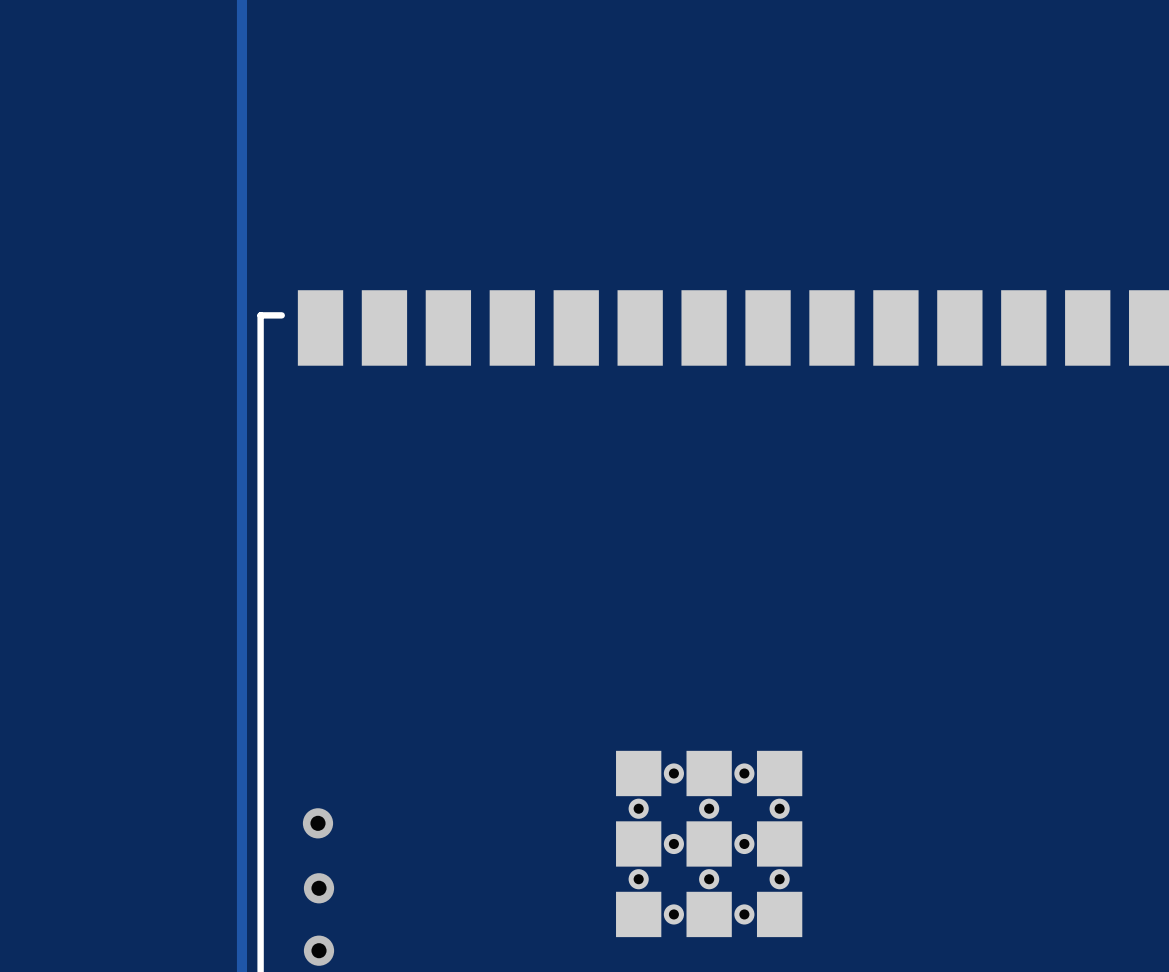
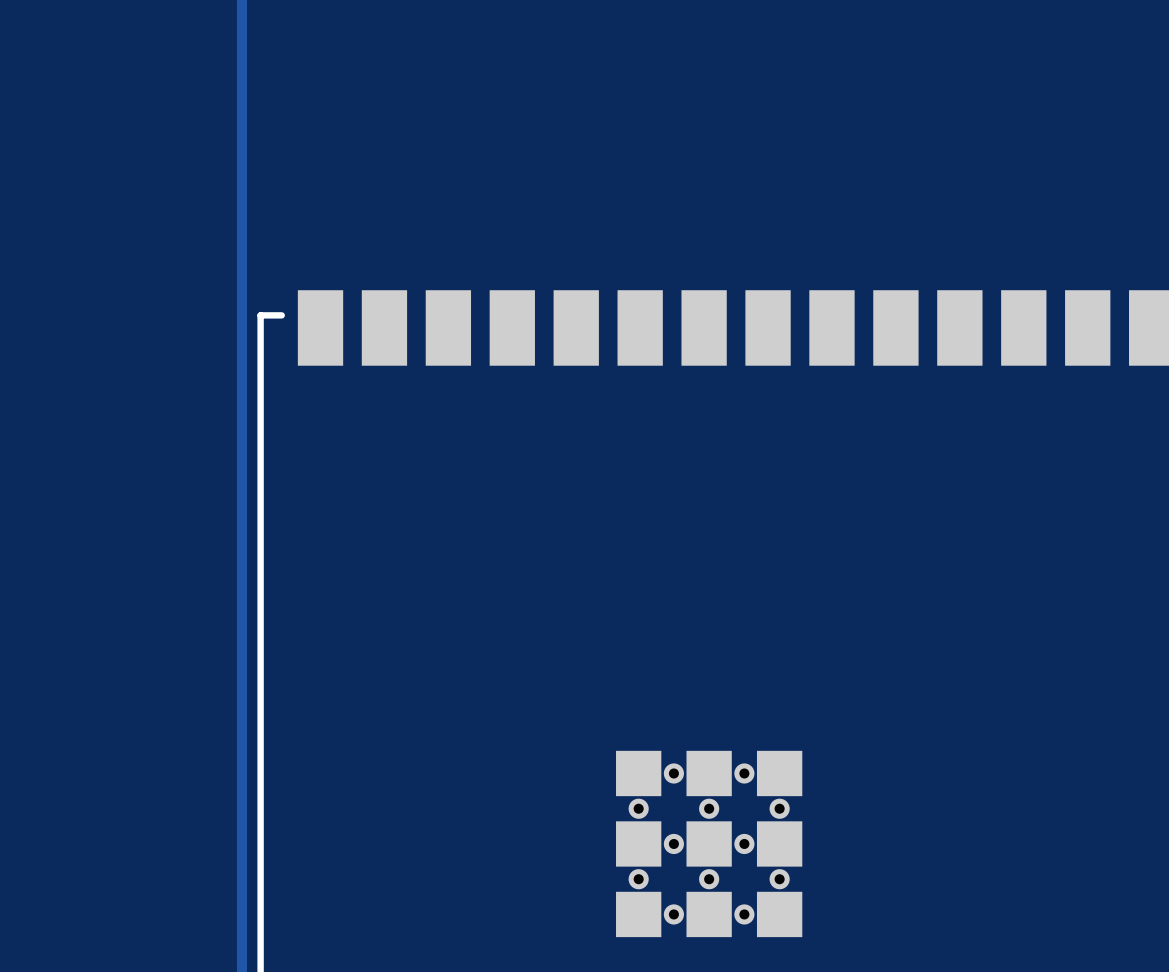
via: (317, 823) -> none
via: (319, 888) -> none
via: (319, 950) -> none

